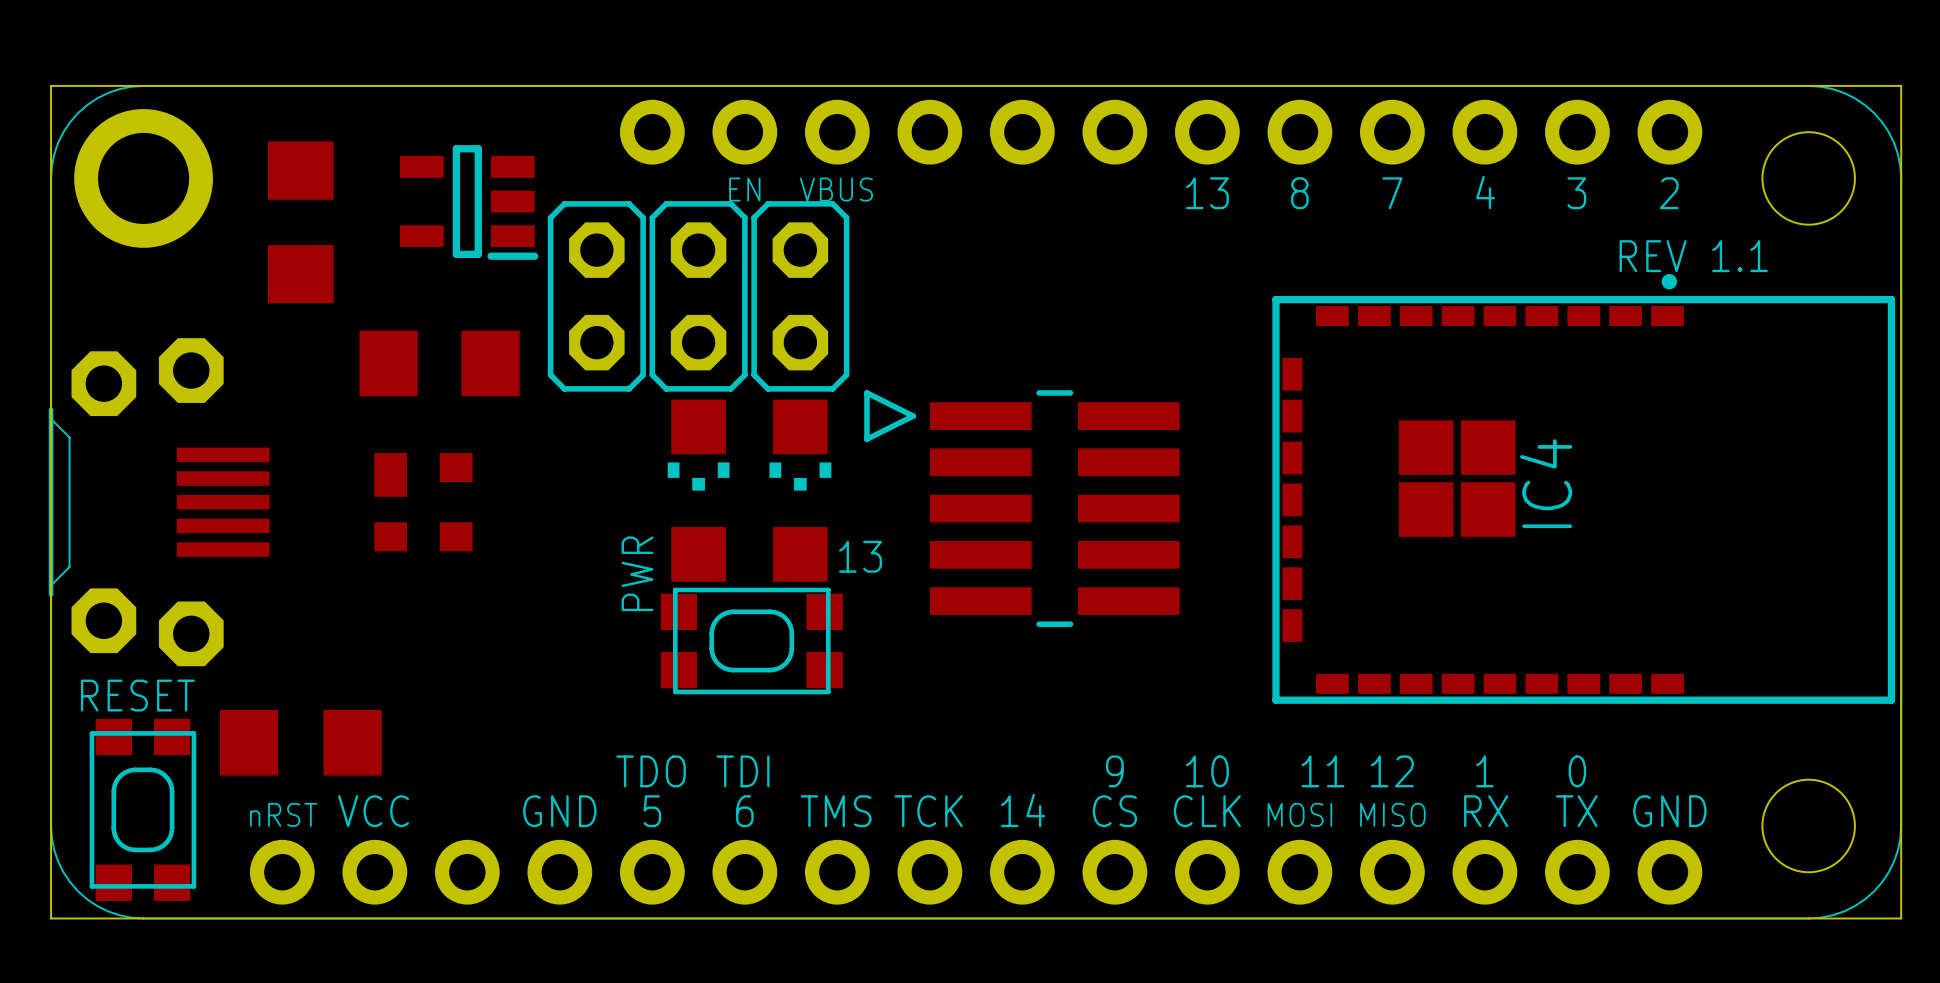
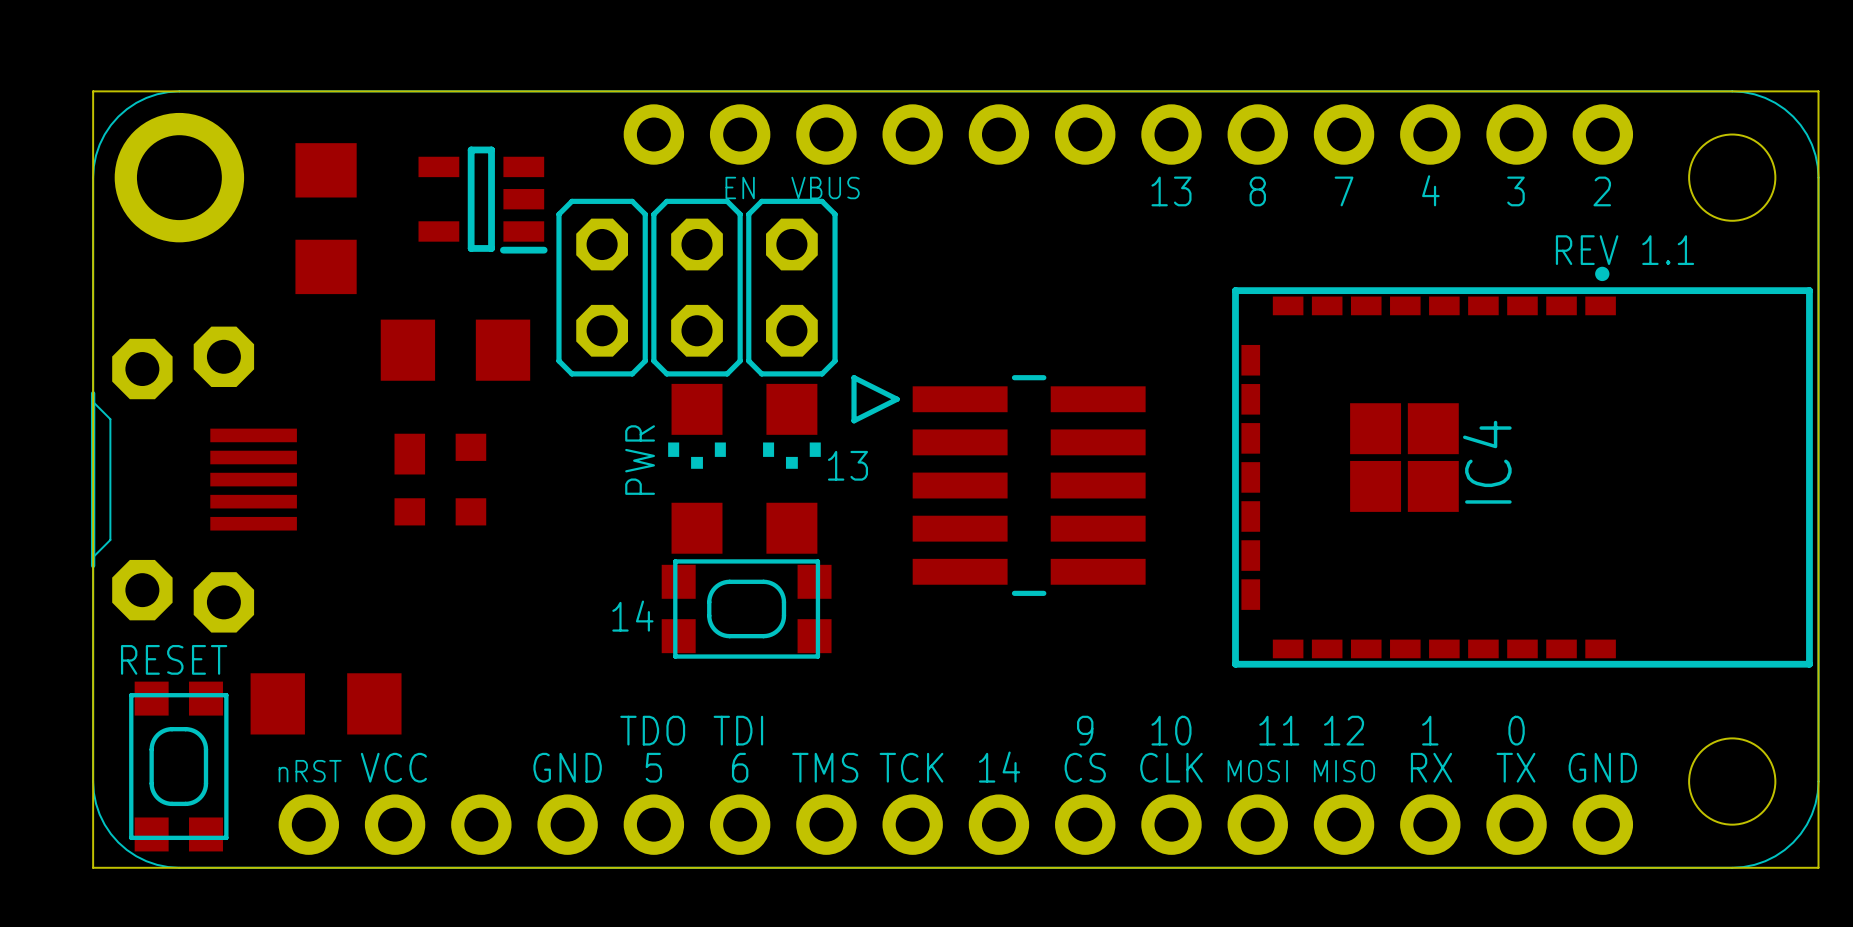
text position: 13 (860, 556) -> 13 (847, 465)
text position: PWR (637, 573) -> PWR (640, 460)
text: none -> 14 (632, 616)

